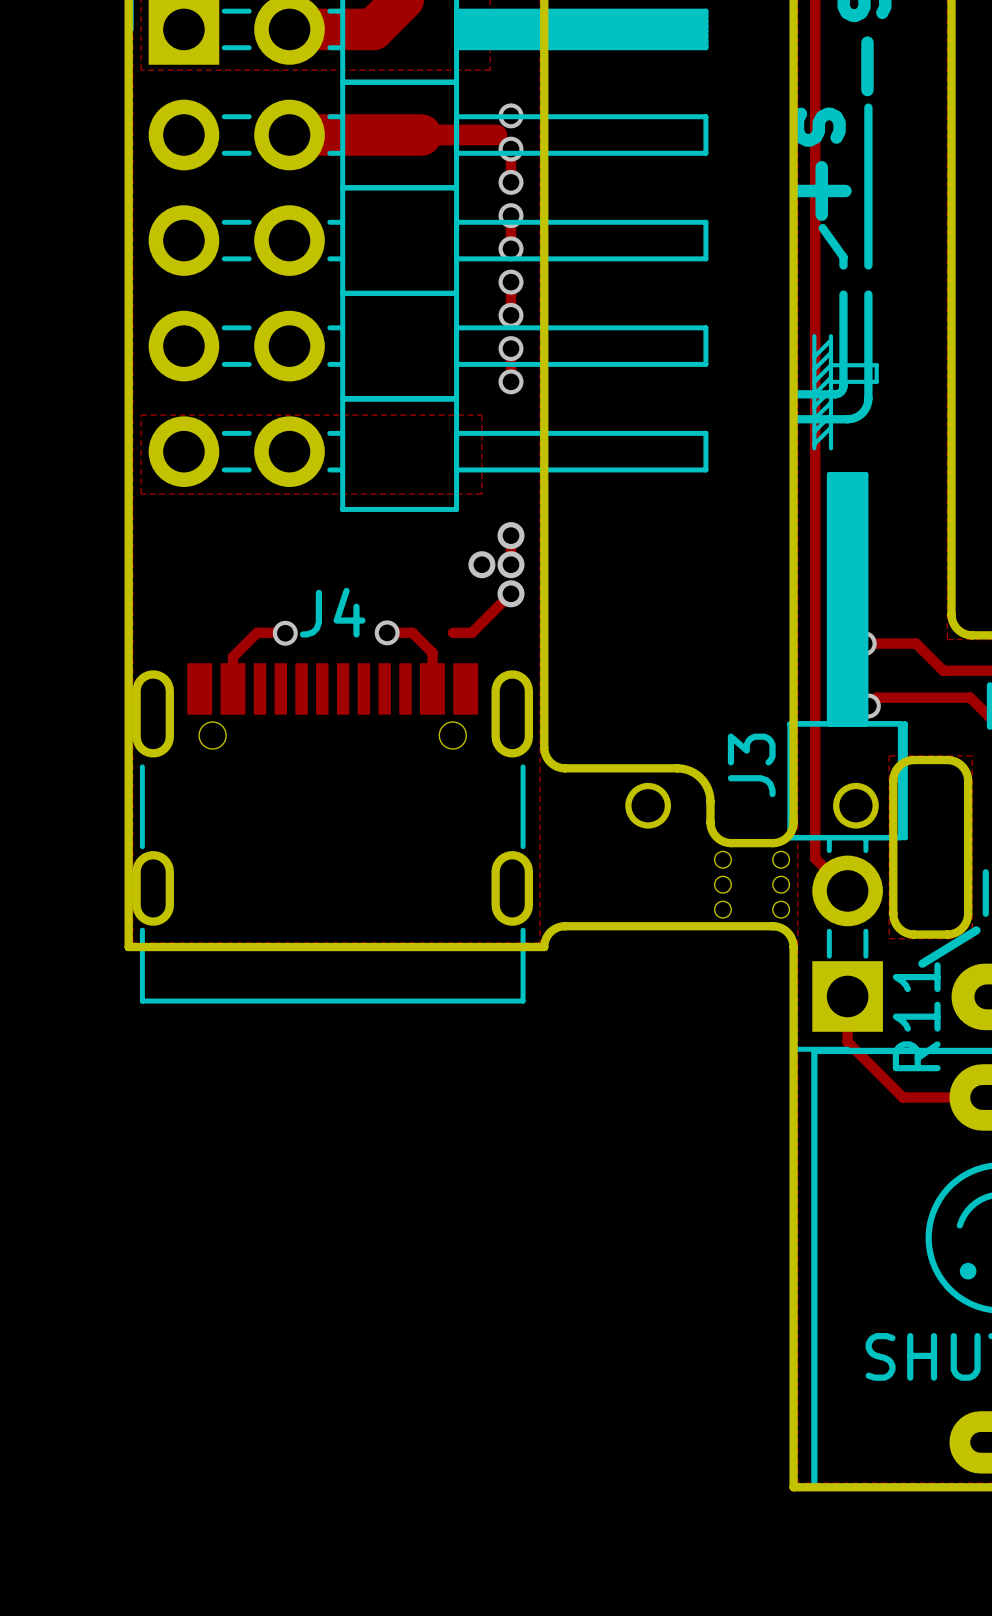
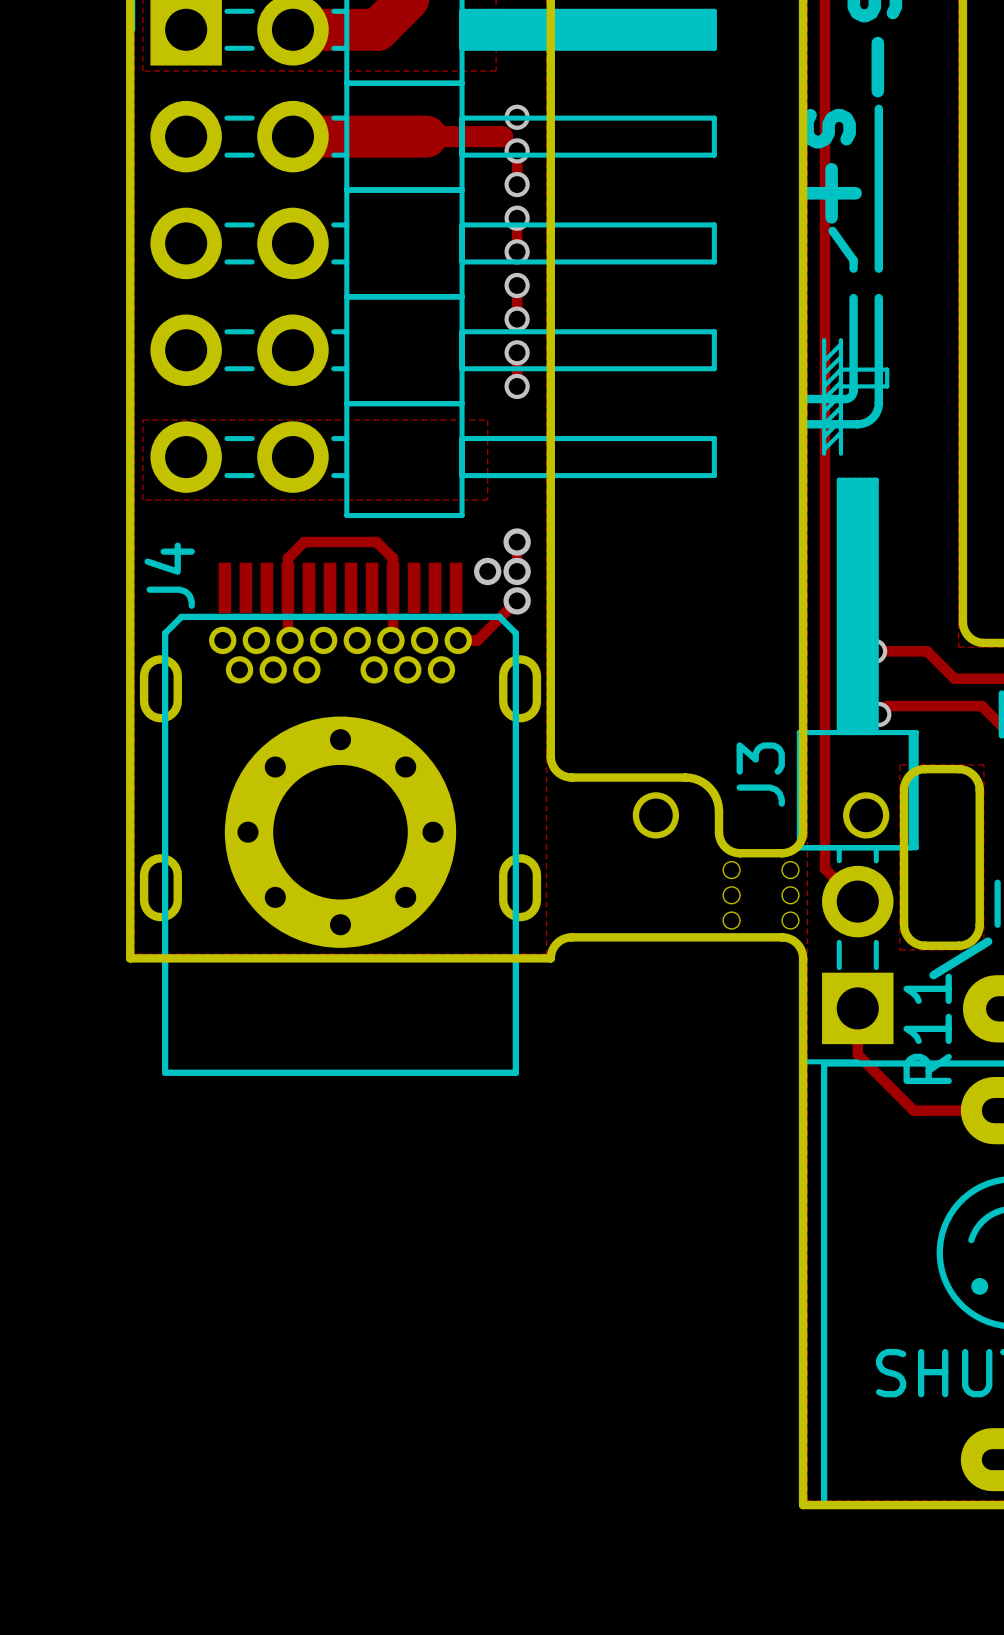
J4 name position: J4 (332, 612) -> J4 (169, 575)
track: none -> (287, 638) (287, 558) (304, 542) (376, 542) (393, 558) (393, 638)
track: (284, 632) (257, 632) (232, 656) (232, 688) -> none
track: (386, 632) (412, 632) (432, 652) (432, 688) -> none
via: (387, 632) -> none
via: (285, 633) -> none
J4 footprint: [132, 663, 534, 1004] -> [139, 562, 542, 1076]
part: none -> (340, 832)

